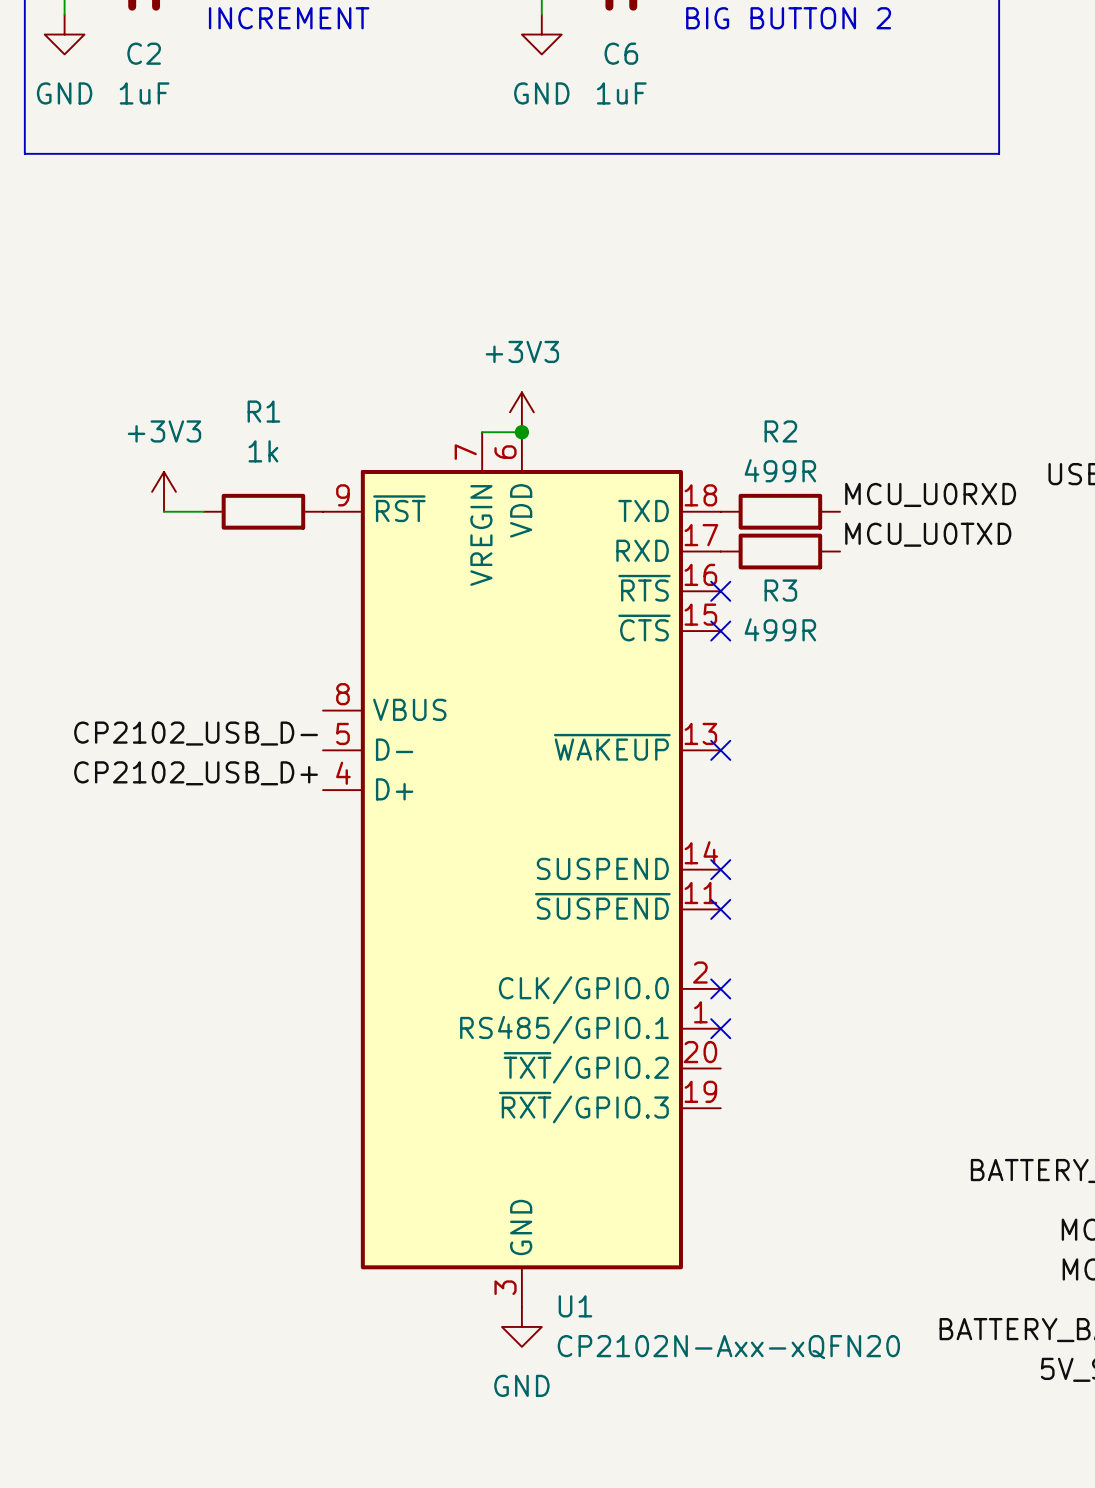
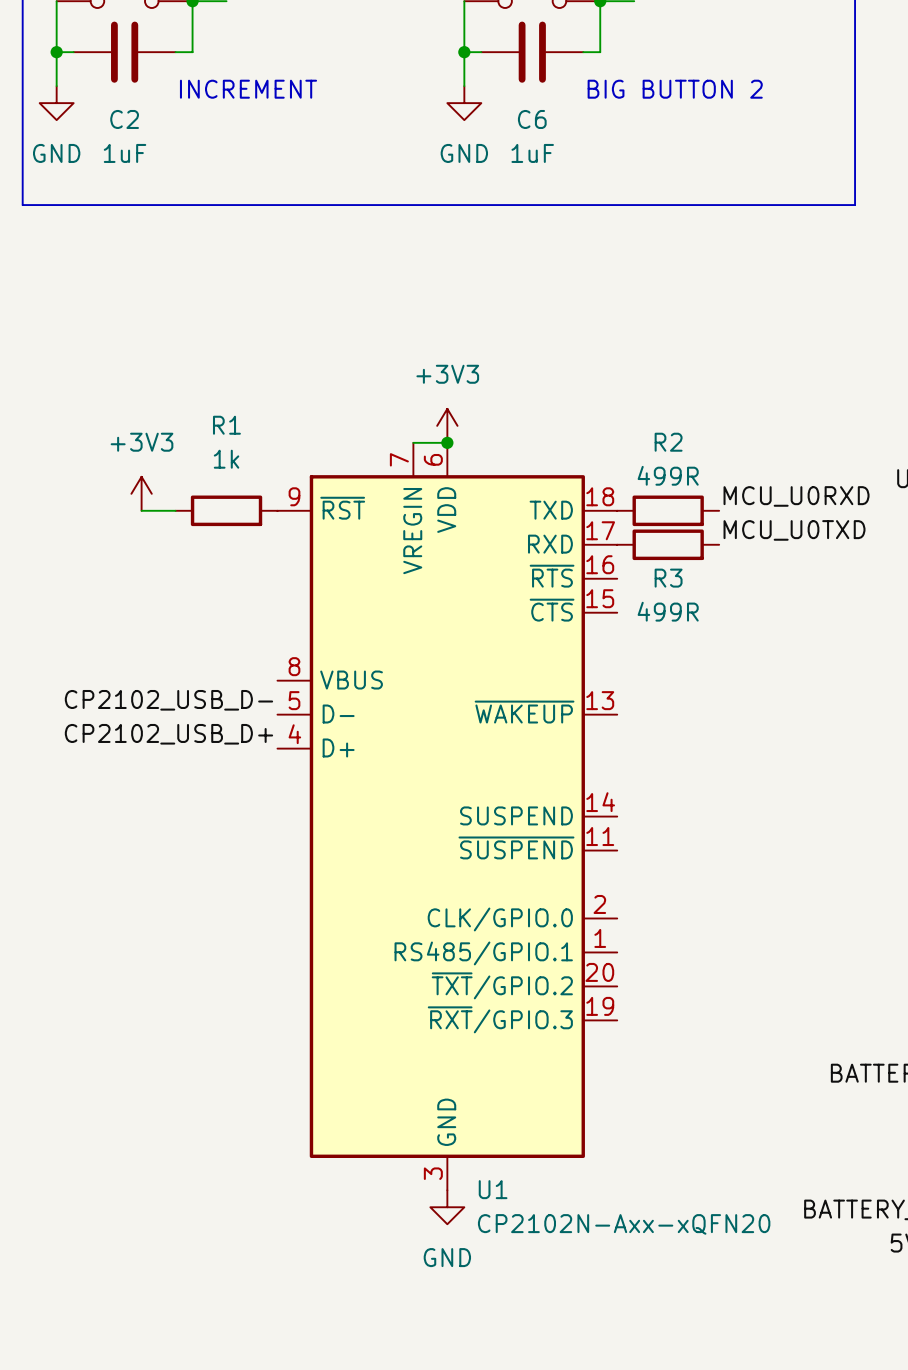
no-connect mark: (720, 591) -> none
no-connect mark: (720, 631) -> none
no-connect mark: (720, 750) -> none
no-connect mark: (720, 869) -> none
no-connect mark: (720, 909) -> none
no-connect mark: (720, 988) -> none
no-connect mark: (720, 1028) -> none

